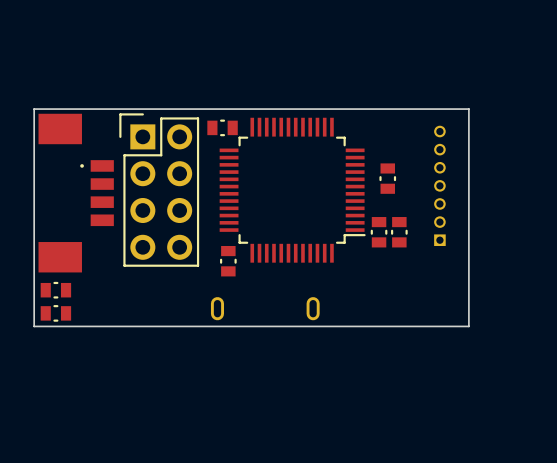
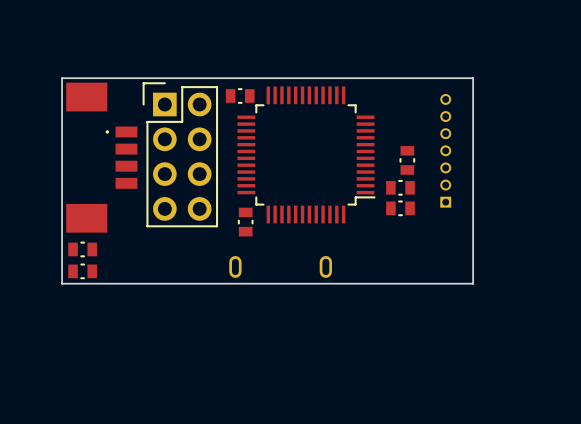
part: (387, 178) -> none
part: none -> (407, 160)
part: none -> (400, 187)
part: (379, 232) -> none
part: (399, 232) -> none
part: none -> (400, 208)

